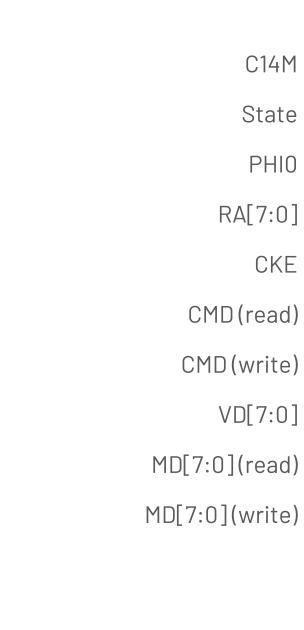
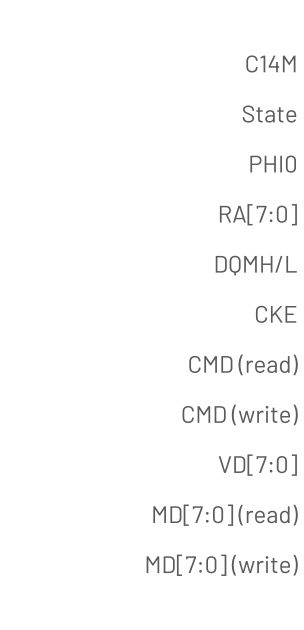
text: CKE (276, 264) -> DQMH/L (256, 265)
text: CMD (read) (243, 314) -> CKE (276, 314)
text: CMD (write) (240, 364) -> CMD (read) (243, 364)
text: VD[7:0] (257, 415) -> CMD (write) (240, 414)
text: MD[7:0] (read) (225, 465) -> VD[7:0] (257, 465)
text: MD[7:0] (write) (222, 515) -> MD[7:0] (read) (225, 515)
text: none -> MD[7:0] (write) (222, 565)

